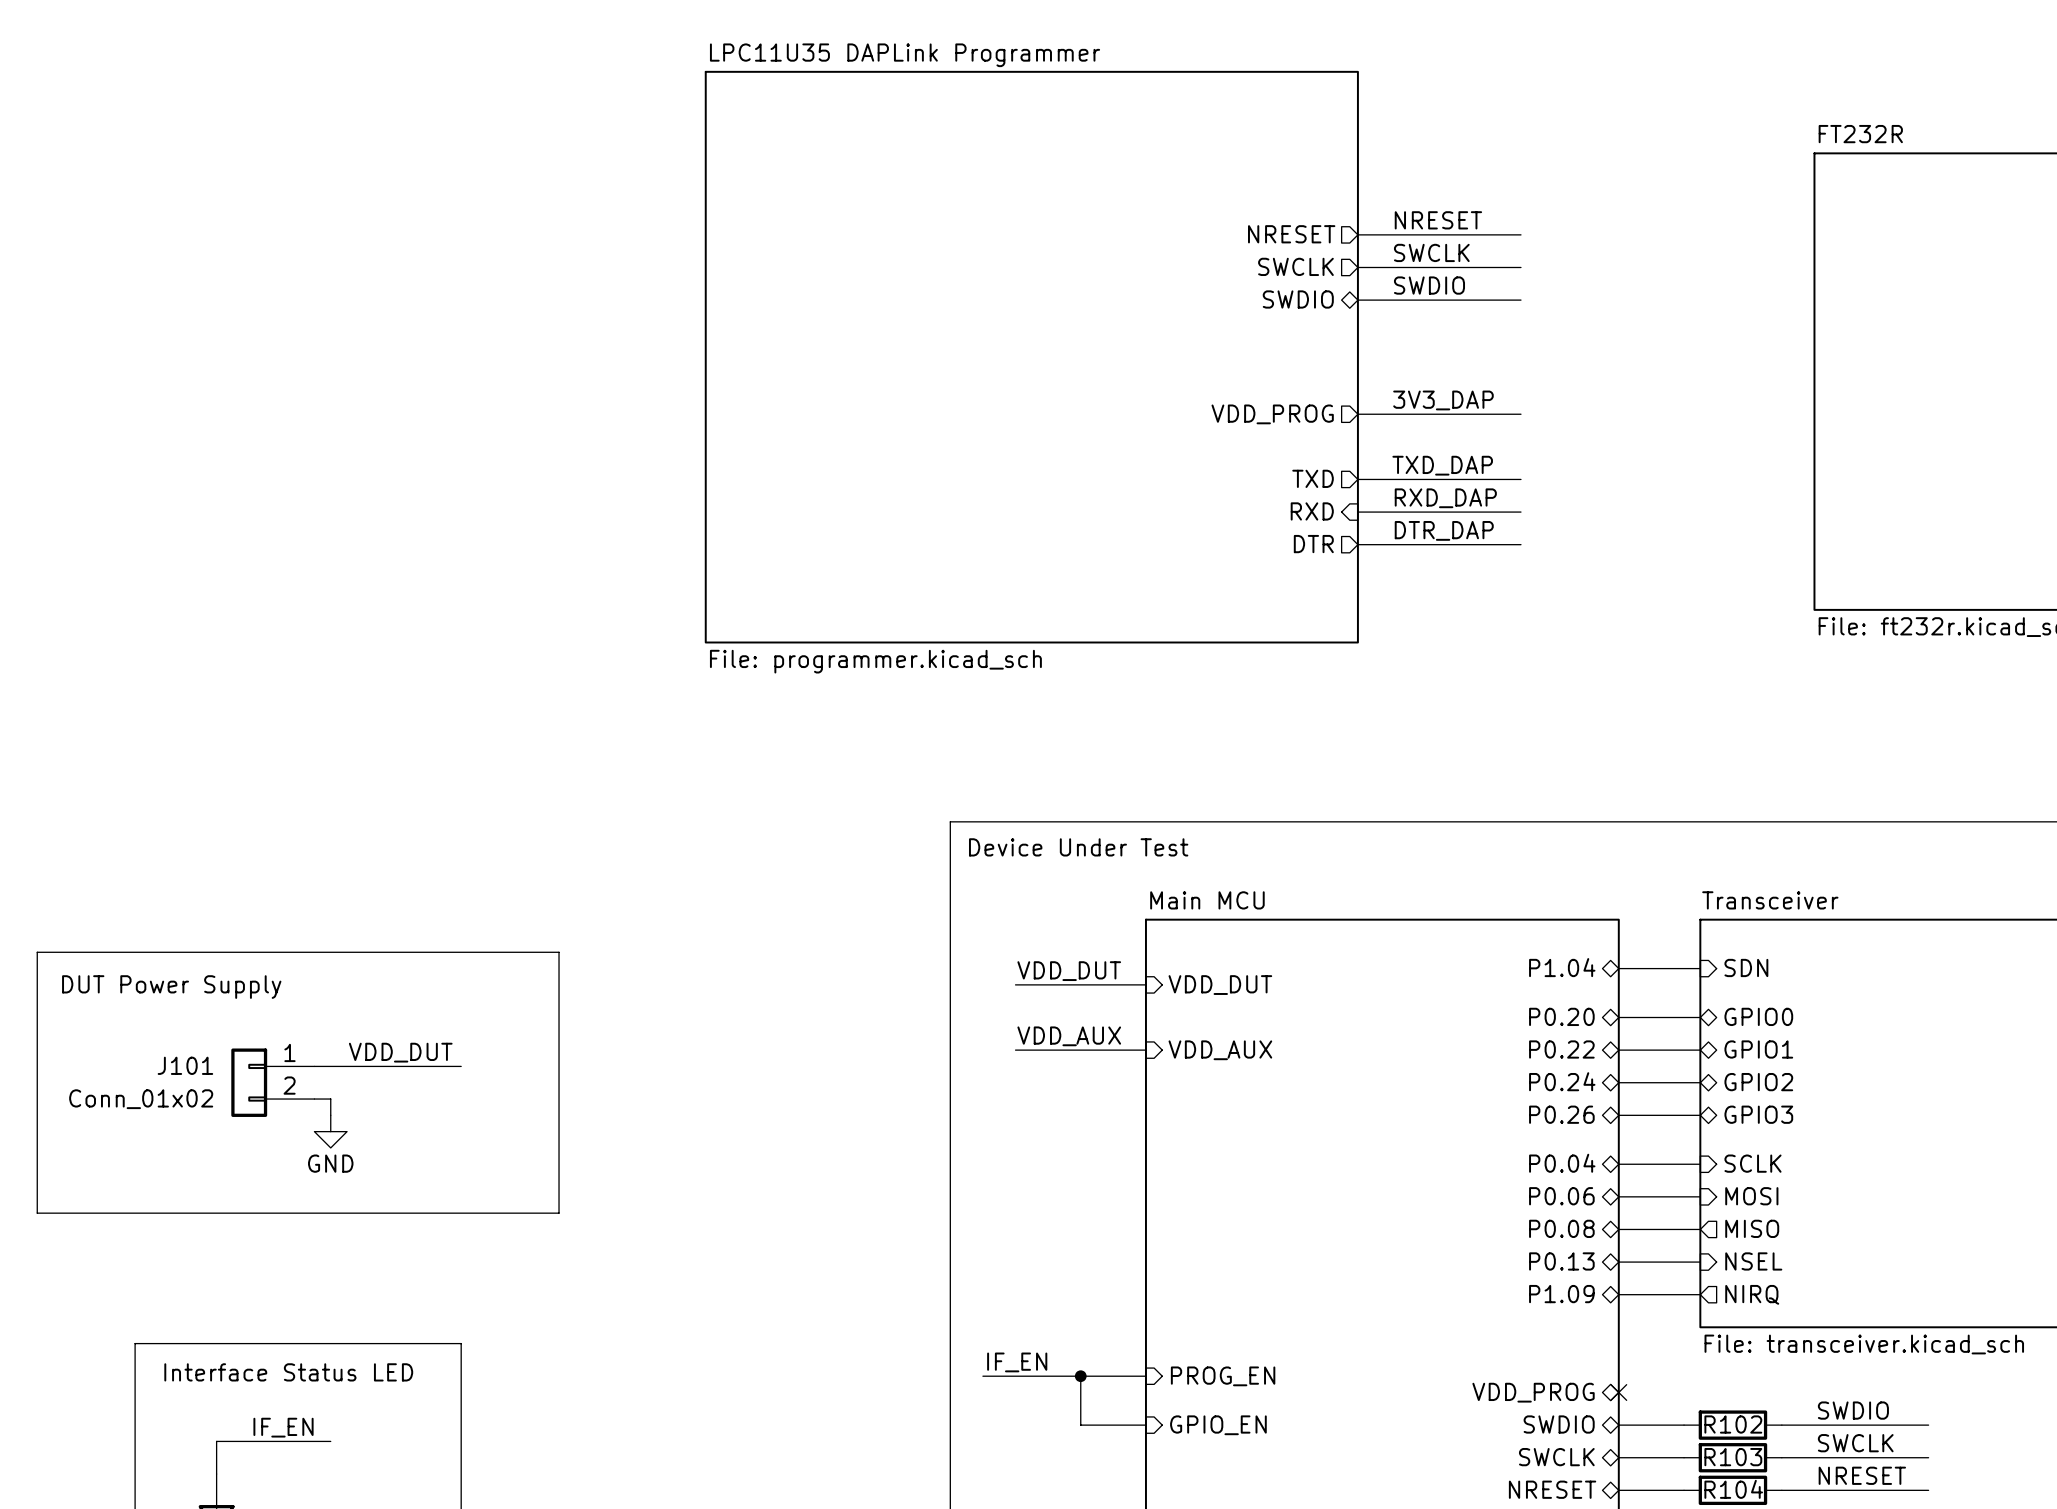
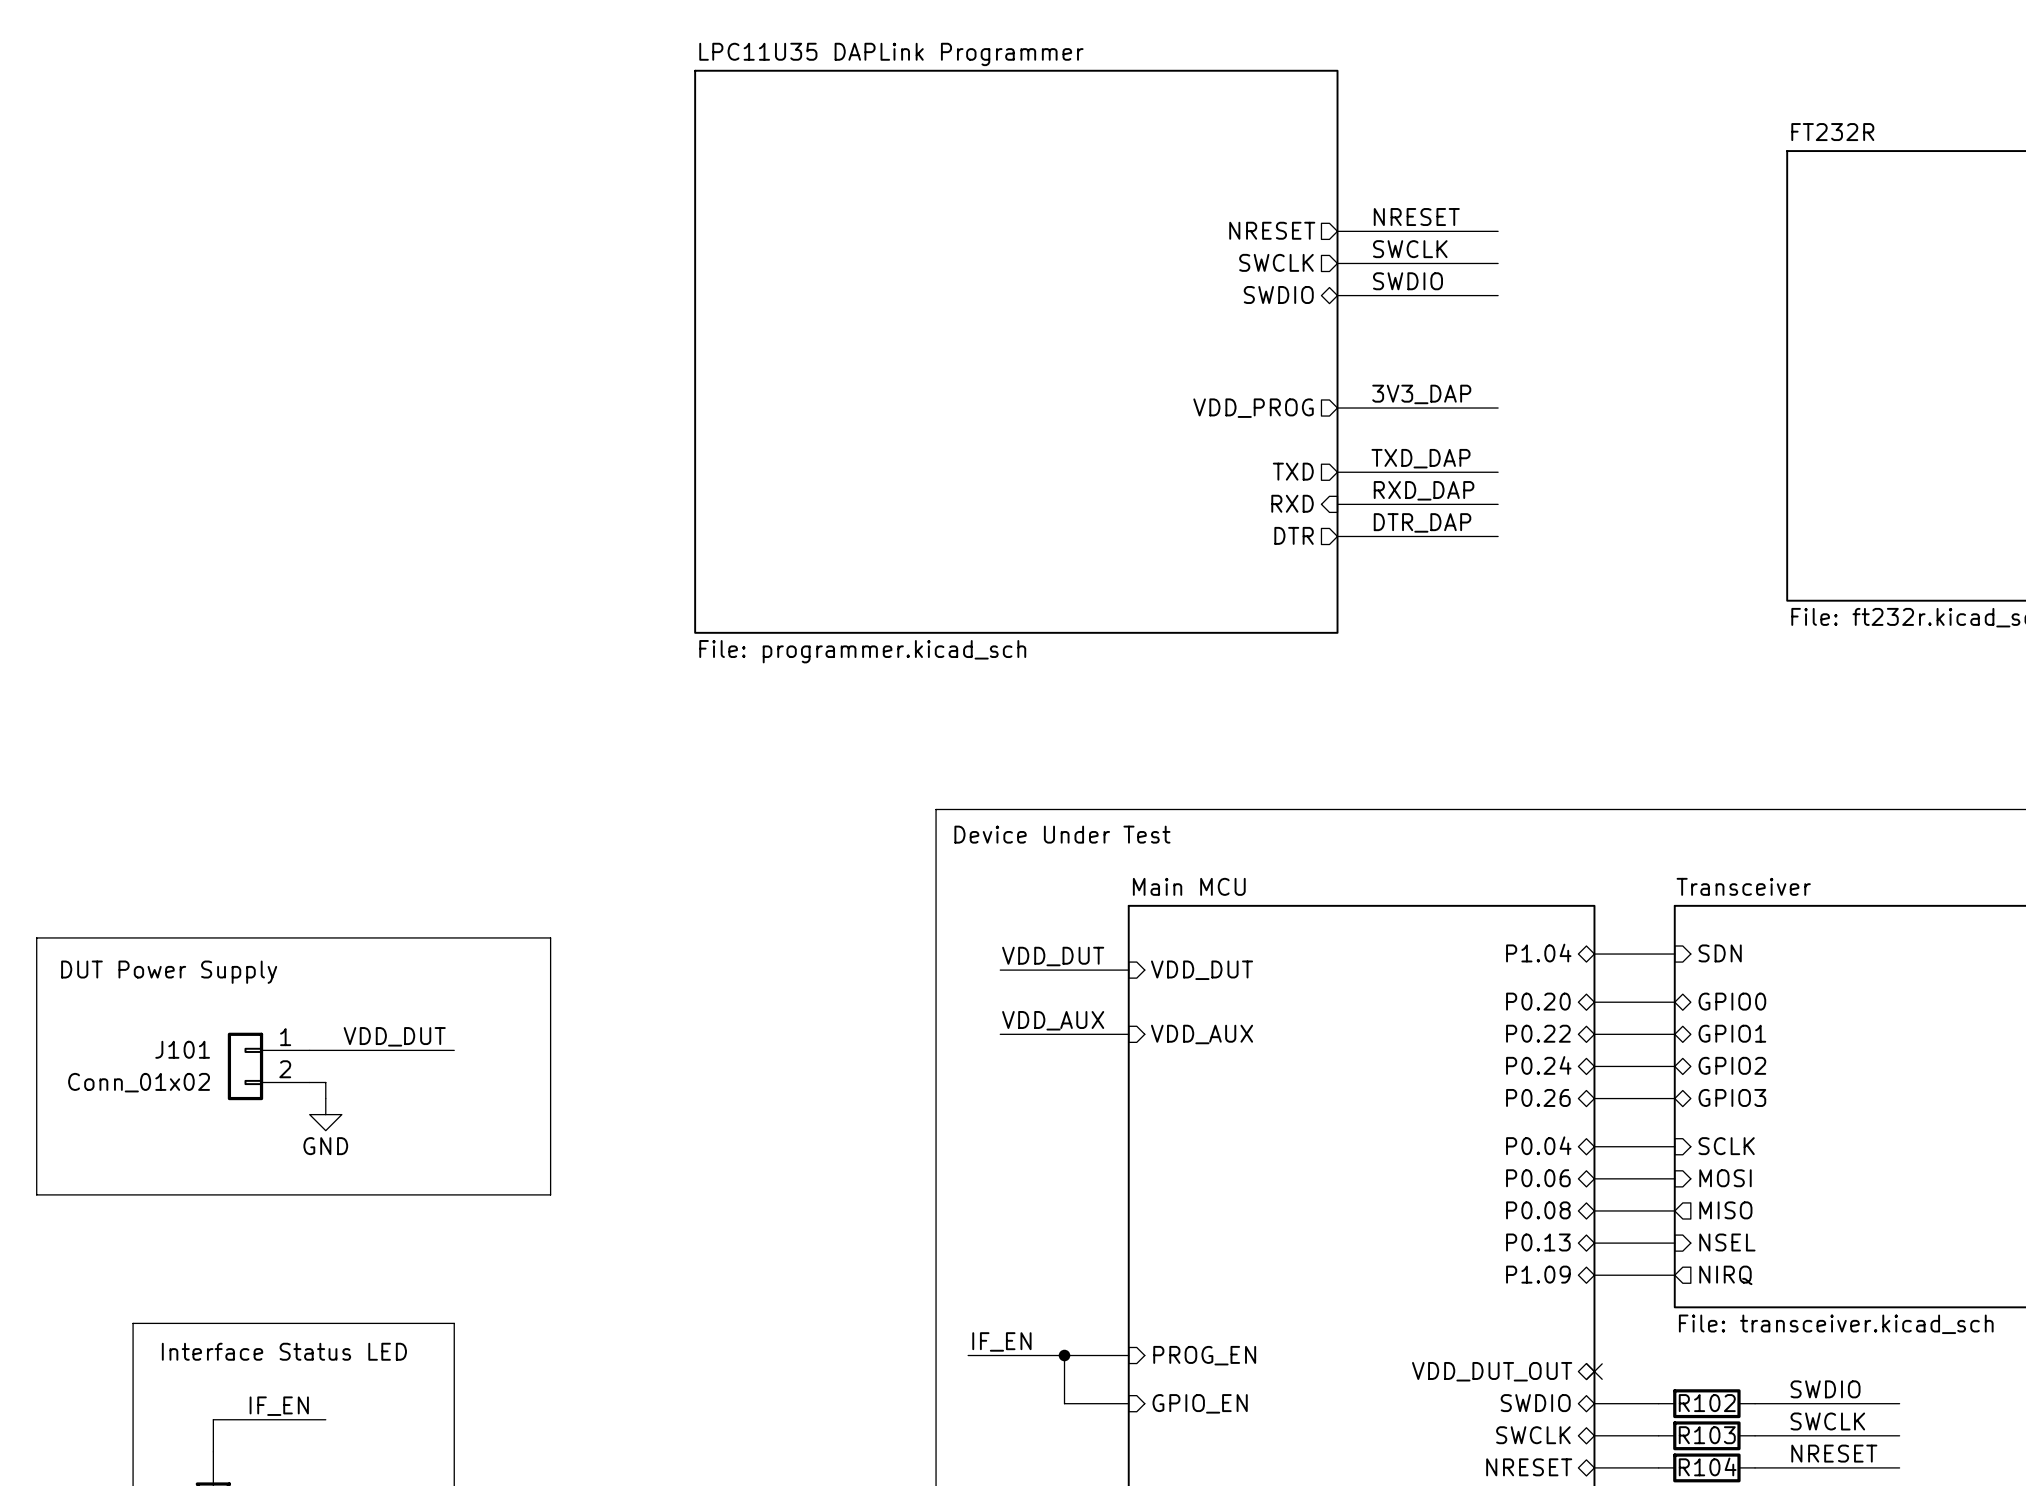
sheet pin: VDD_PROG (1533, 1392) -> VDD_DUT_OUT (1492, 1371)

